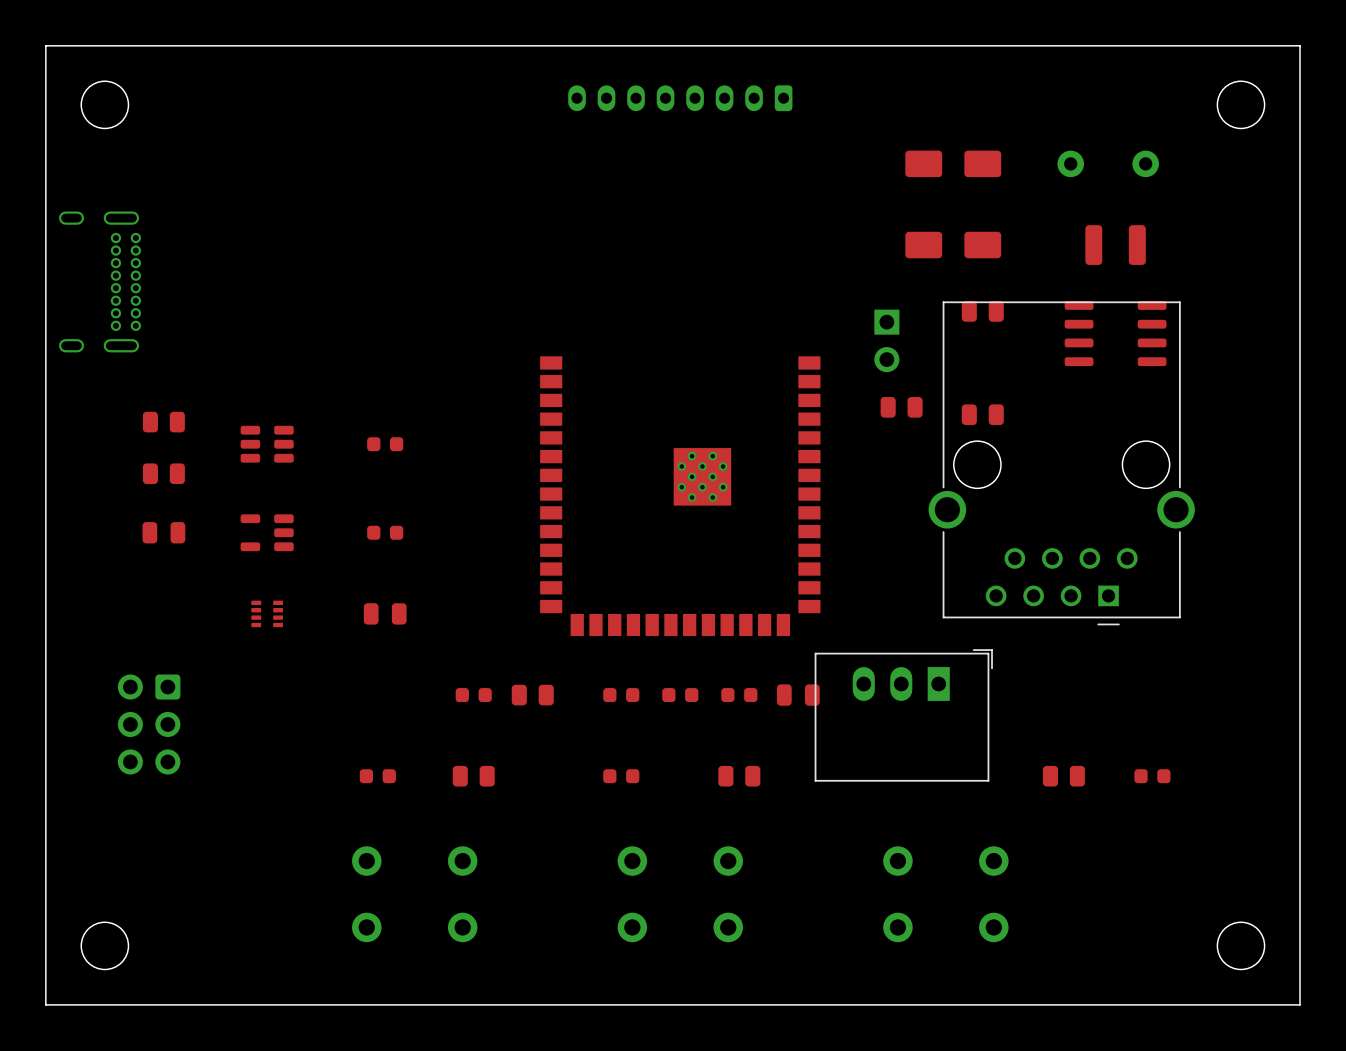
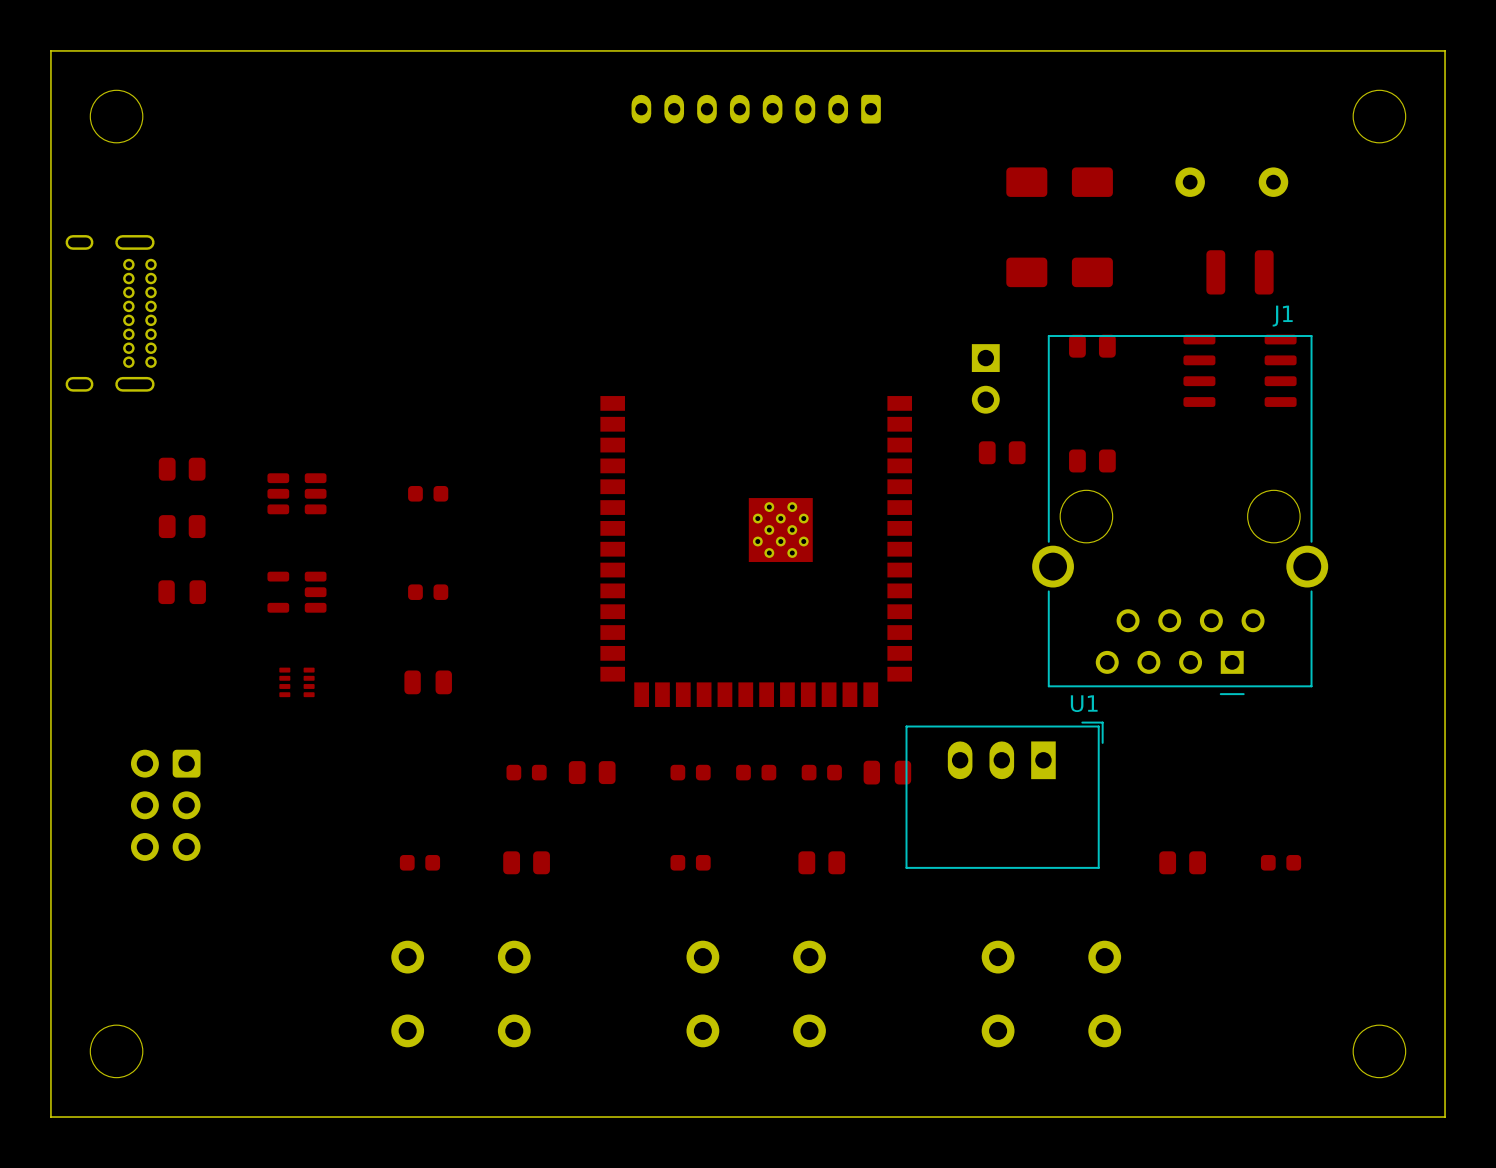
J1 name: none -> J1 (1282, 316)
U1 name: none -> U1 (1084, 703)

